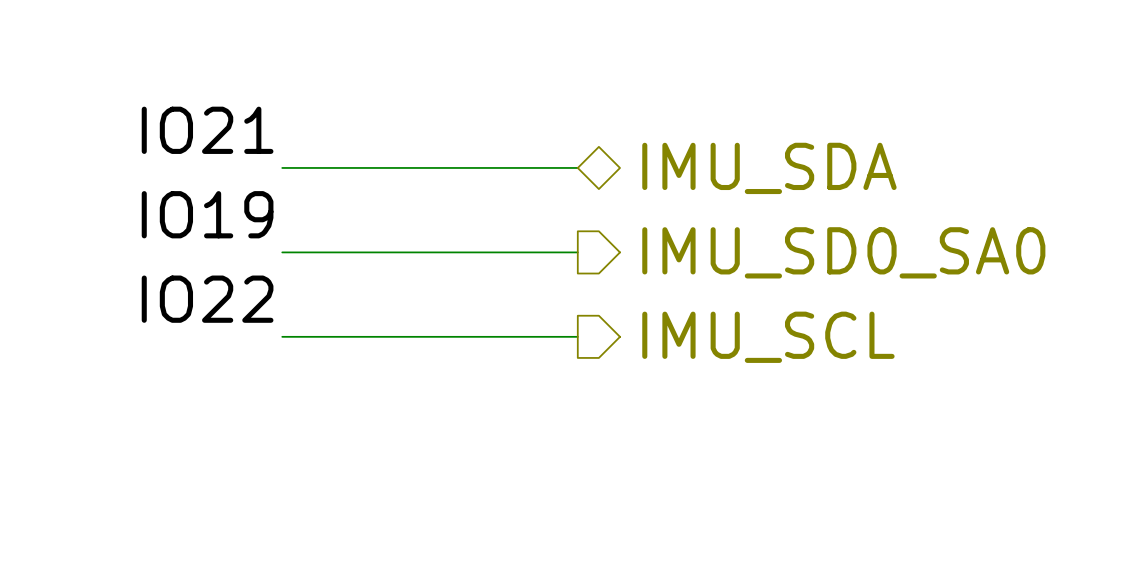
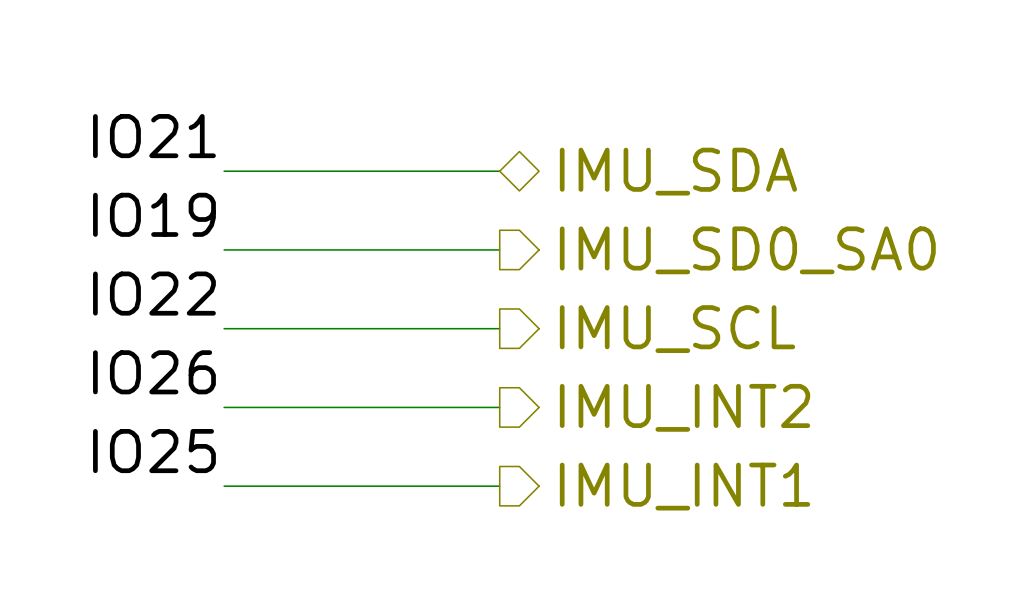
label: none -> IO26 (154, 372)
wire: none -> (224, 407) (499, 407)
hierarchical label: none -> IMU_INT2 (685, 407)
label: none -> IO25 (154, 451)
wire: none -> (224, 486) (499, 486)
hierarchical label: none -> IMU_INT1 (685, 486)

